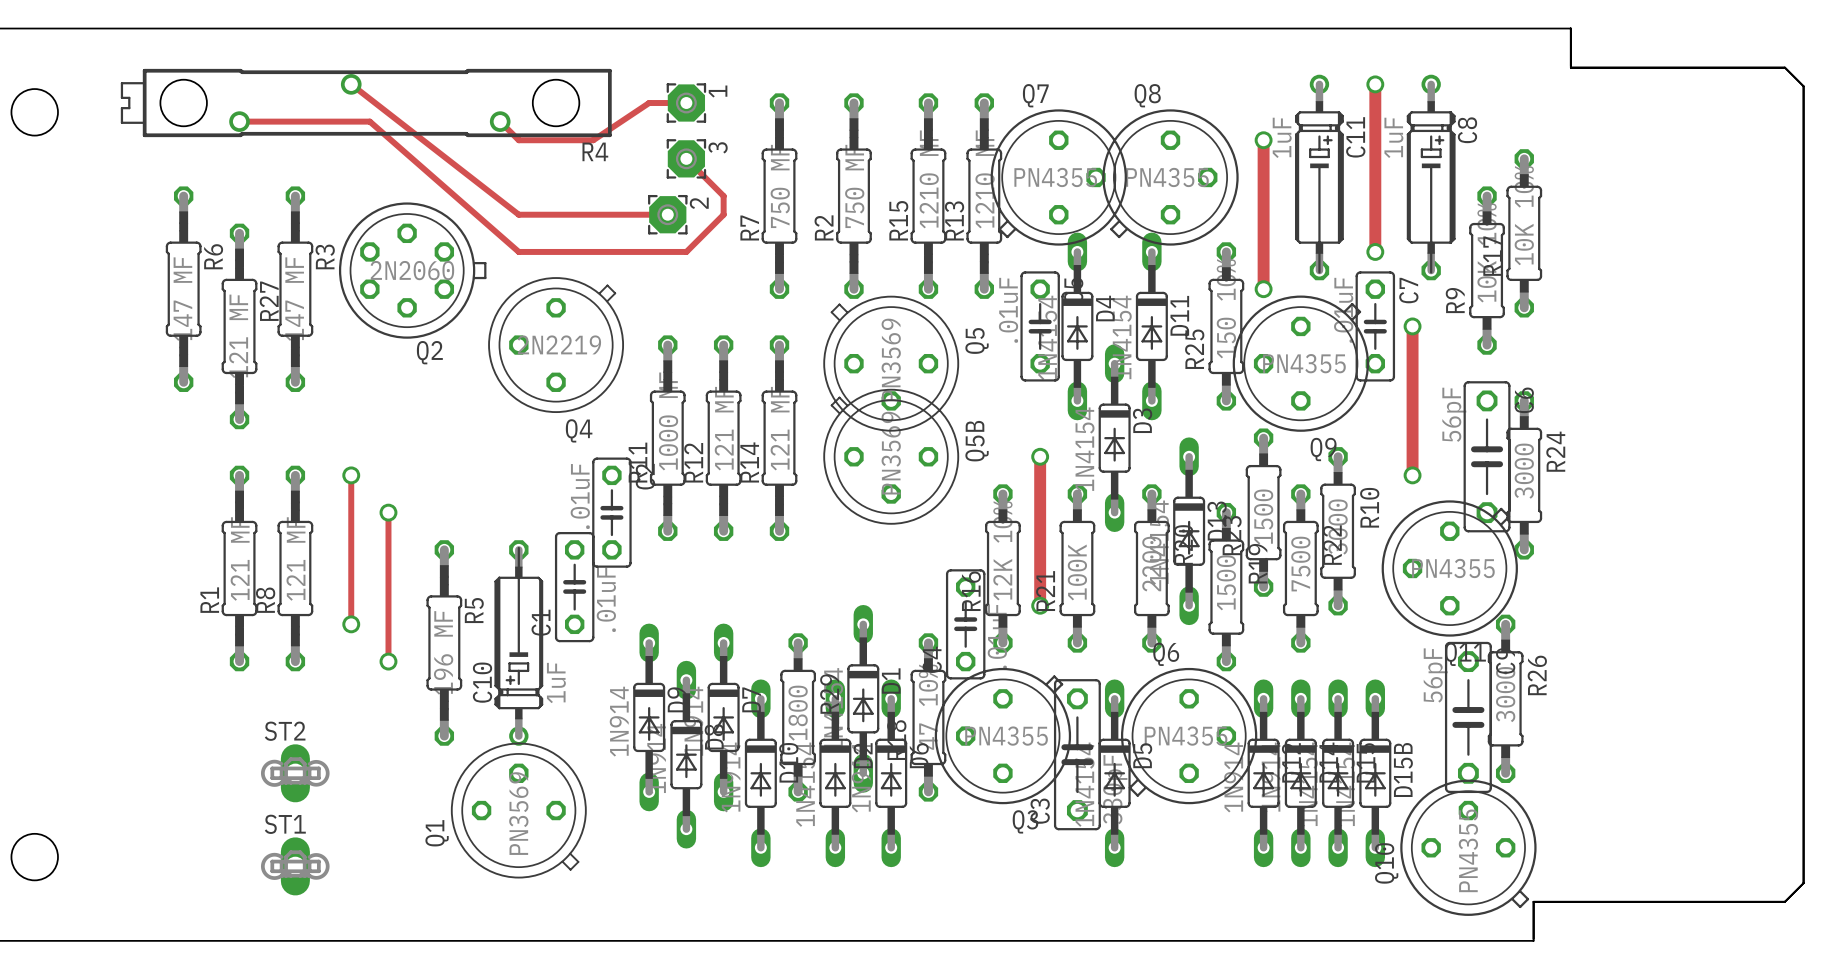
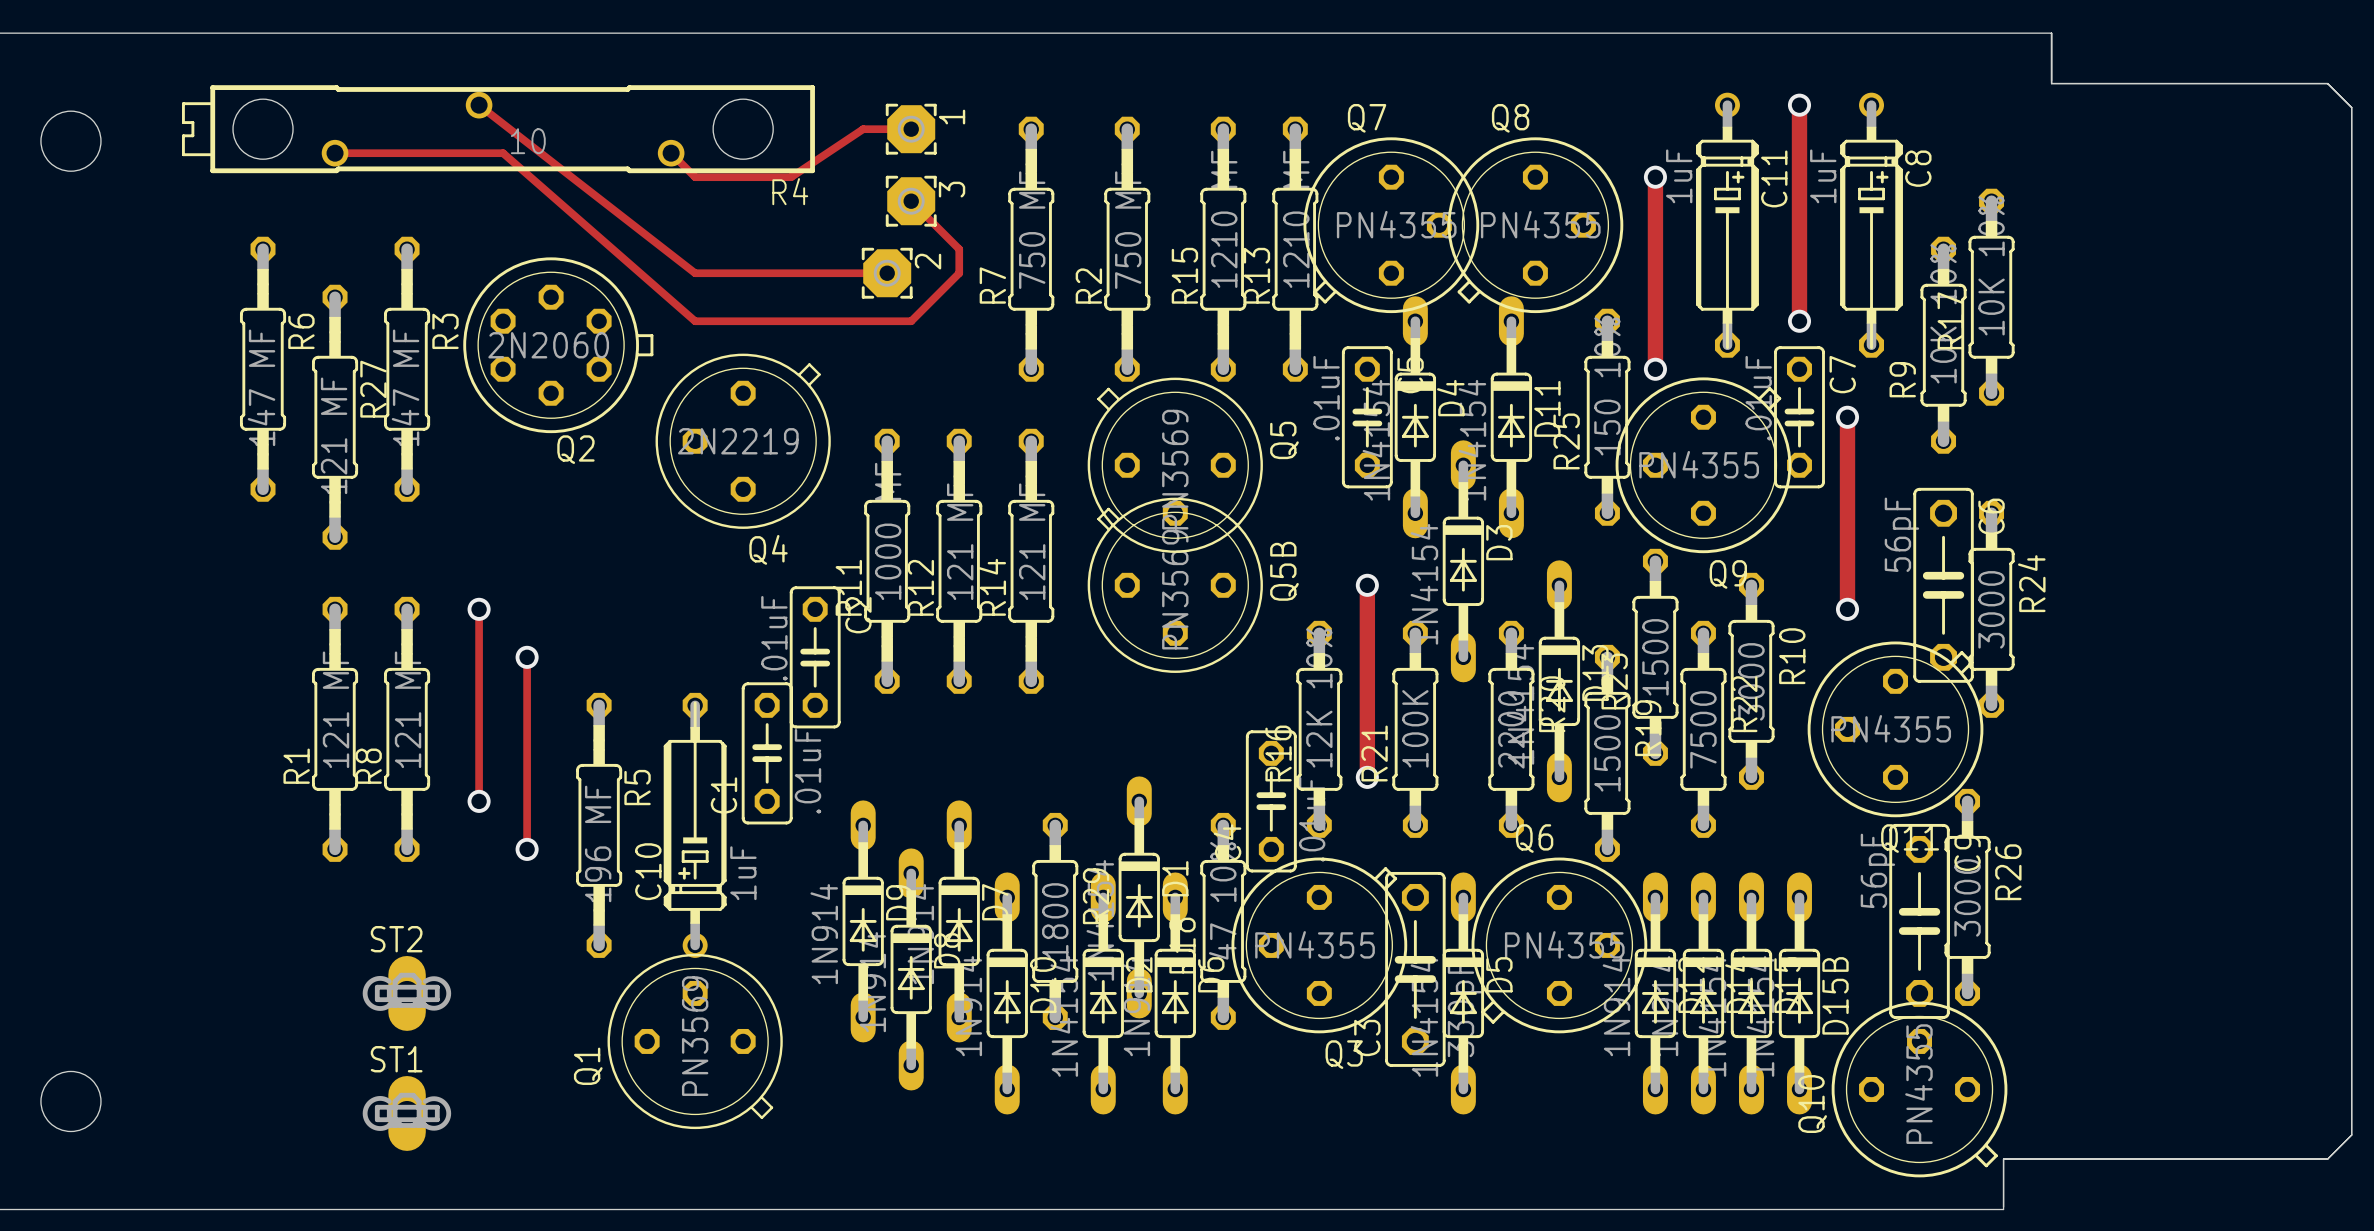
R4 value: none -> 10 (528, 141)

